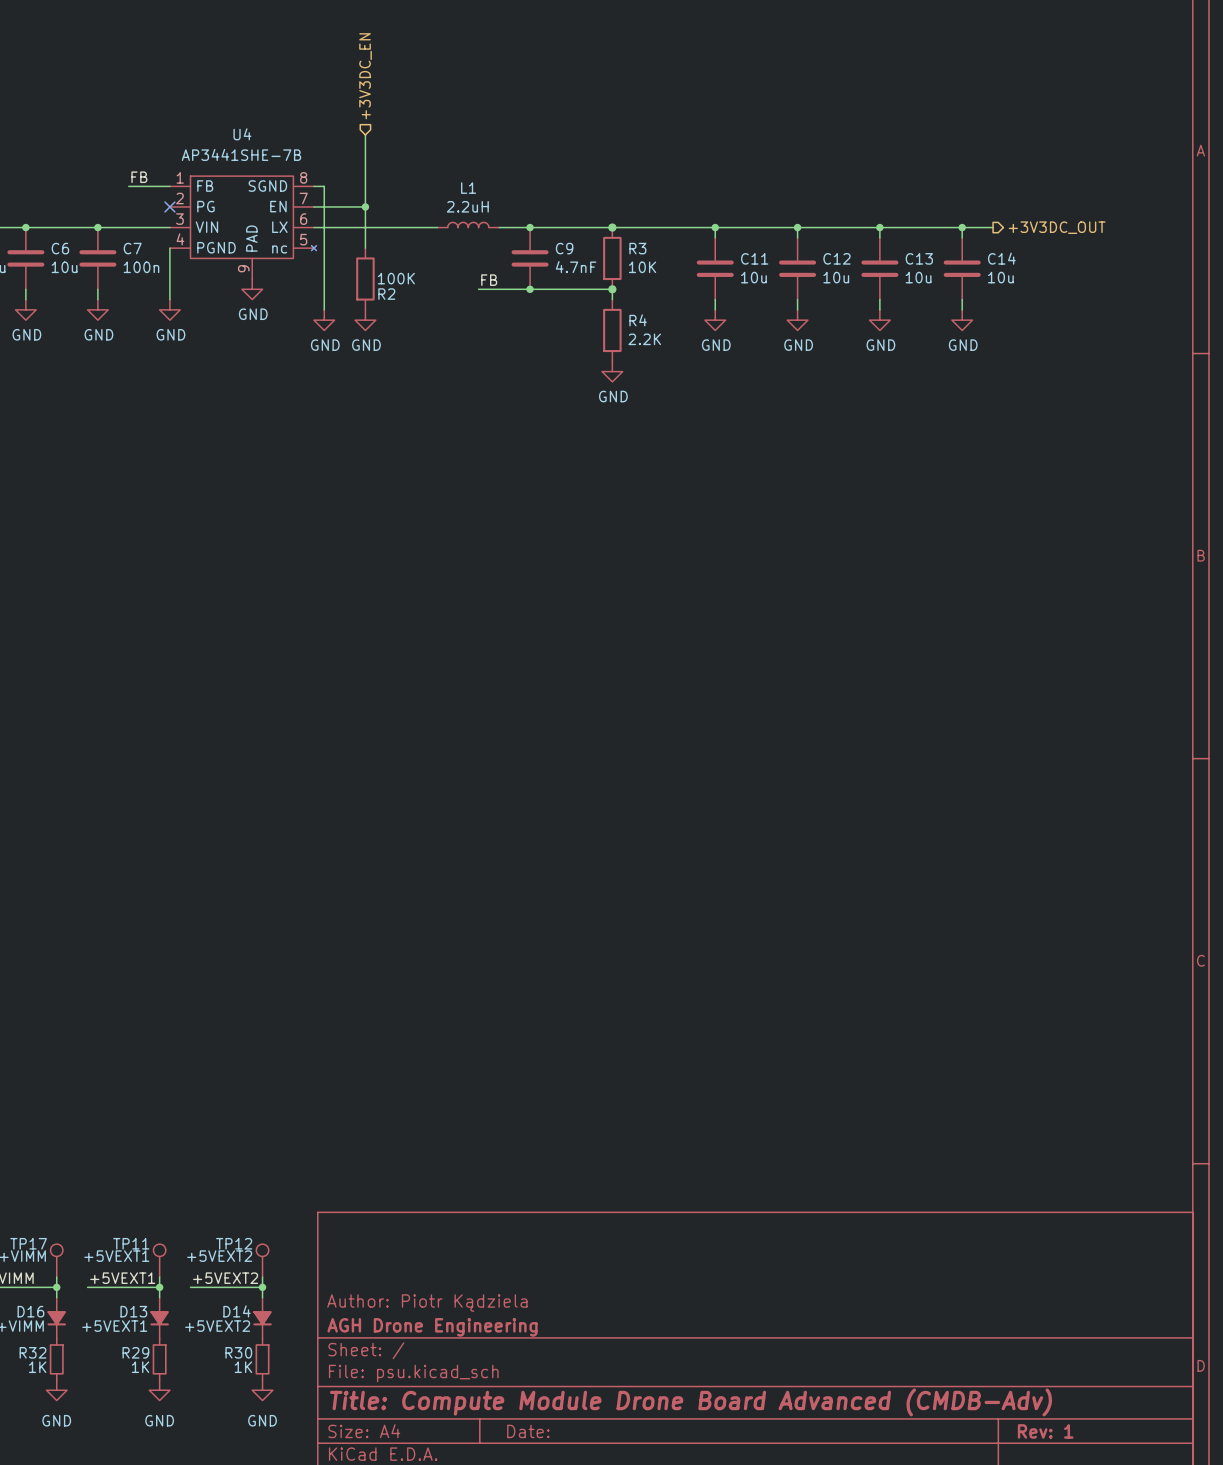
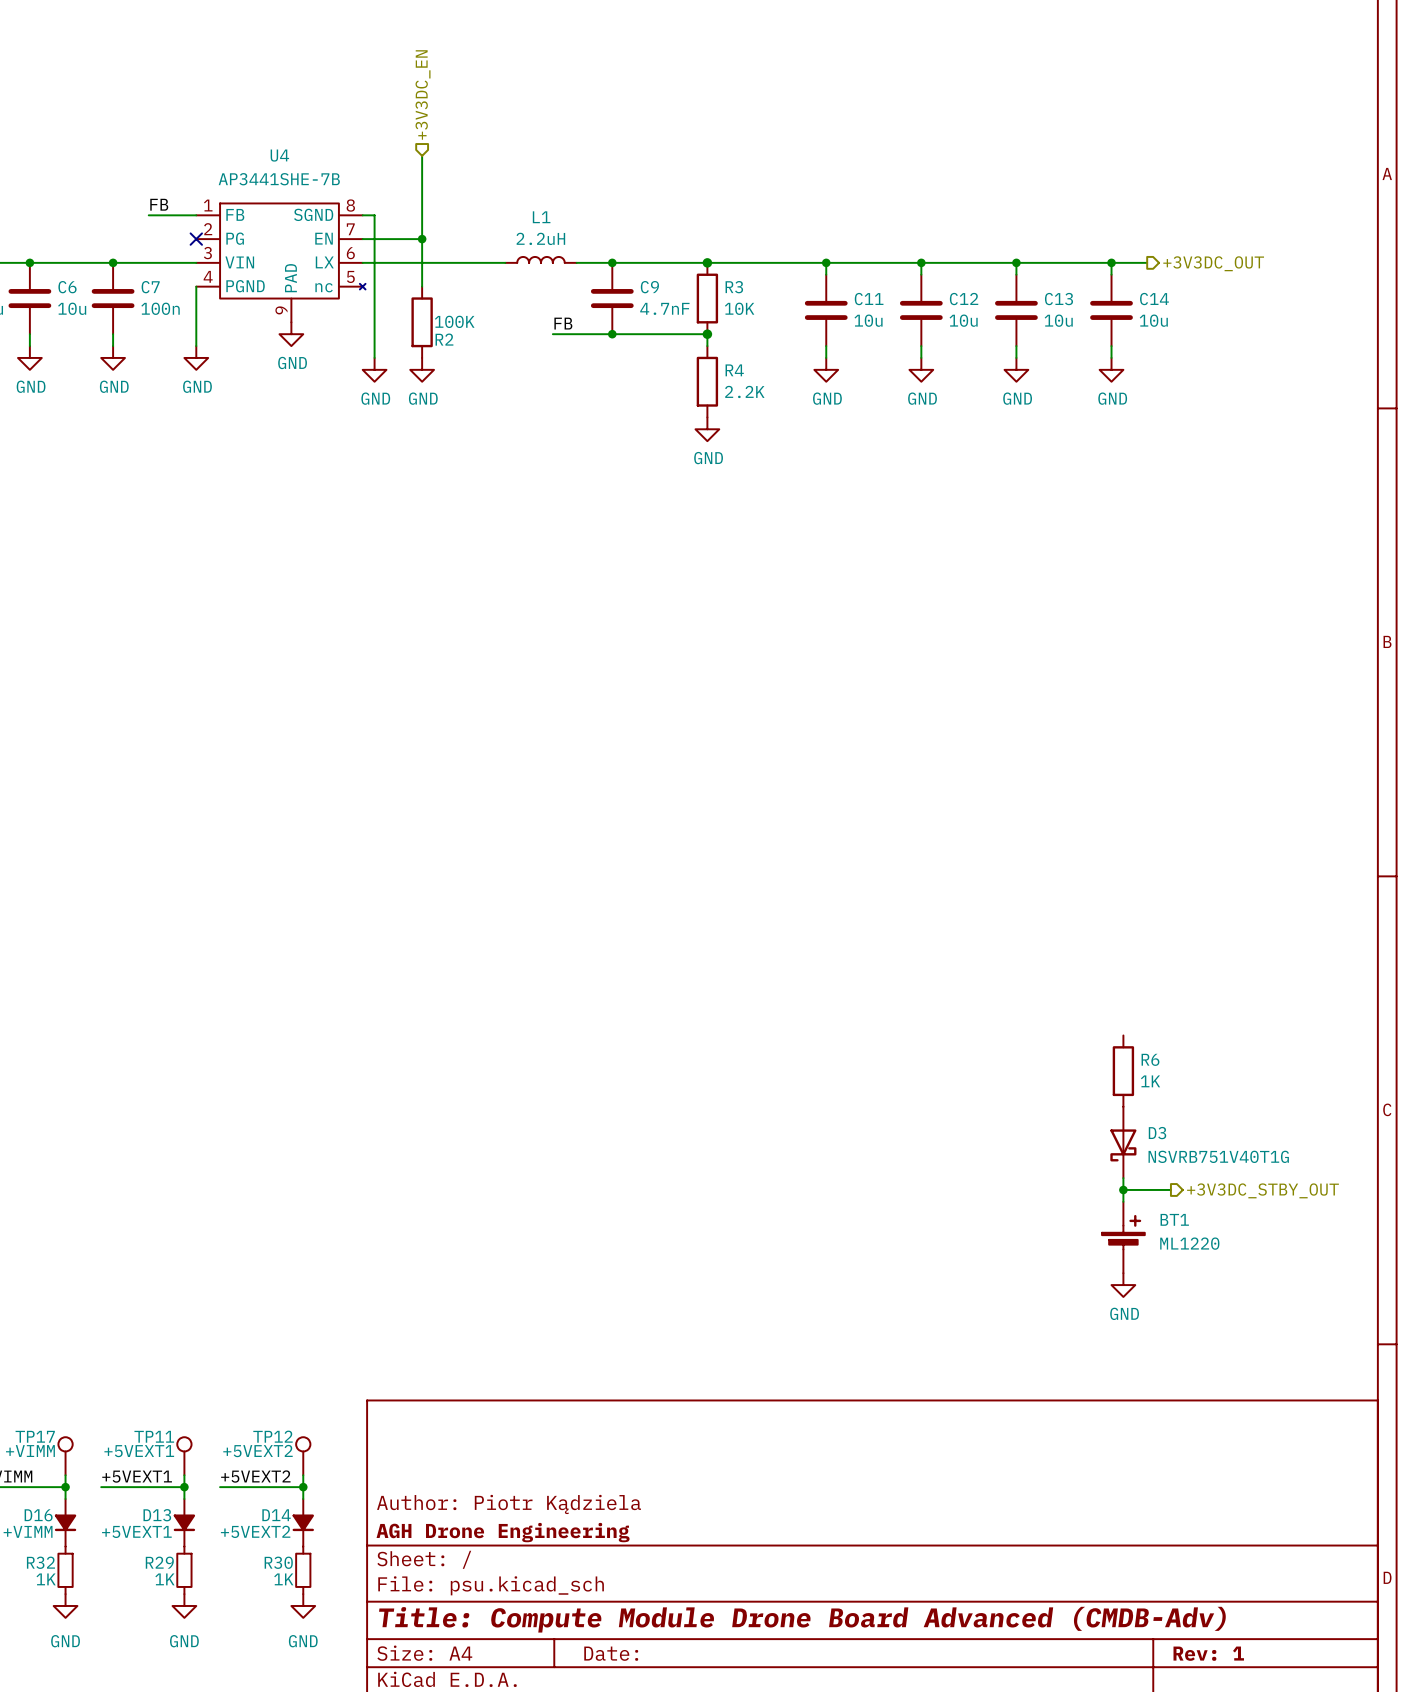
R6: none -> 1K (1123, 1071)
D3: none -> NSVRB751V40T1G (1123, 1142)
wire: none -> (1123, 1178) (1123, 1201)
wire: none -> (1123, 1189) (1170, 1189)
junction: none -> (1123, 1189)
hierarchical label: none -> +3V3DC_STBY_OUT (1262, 1190)
BT1: none -> ML1220 (1123, 1237)
power symbol: none -> GND (1123, 1285)

